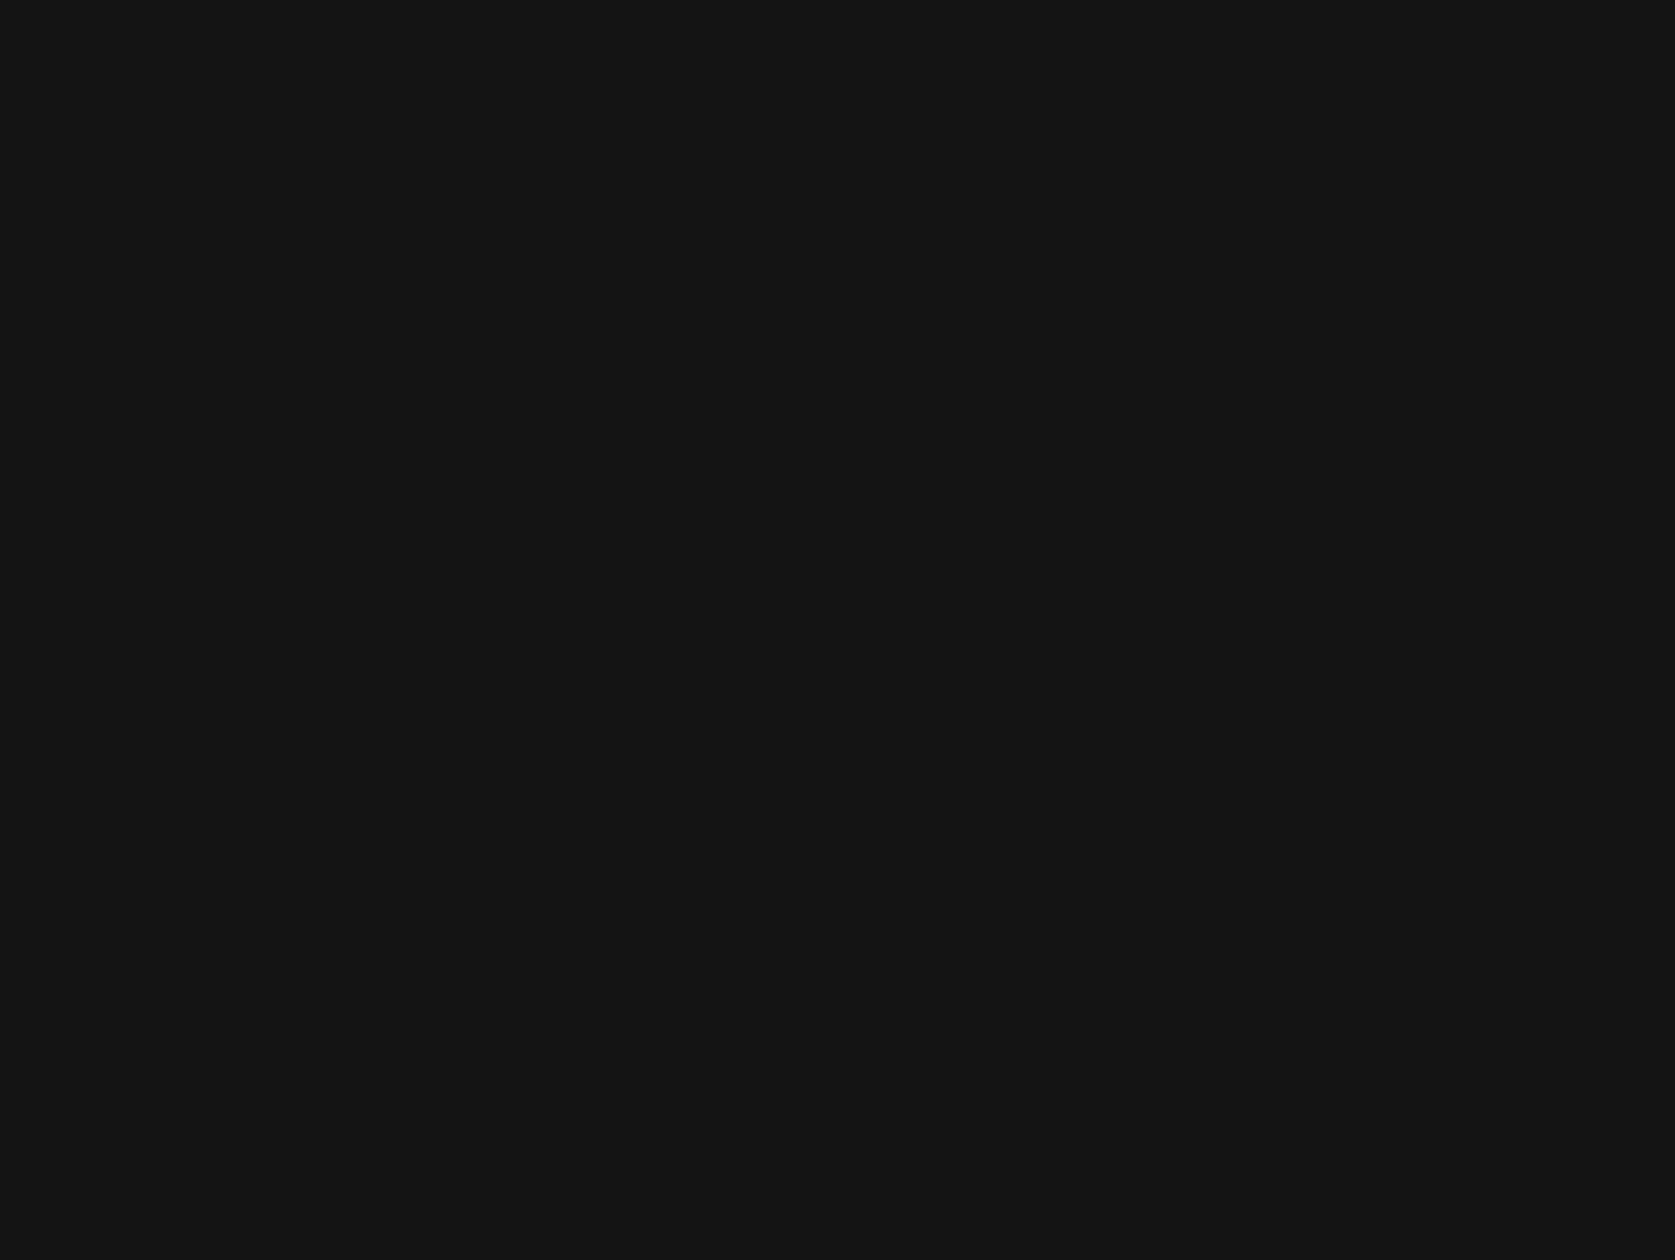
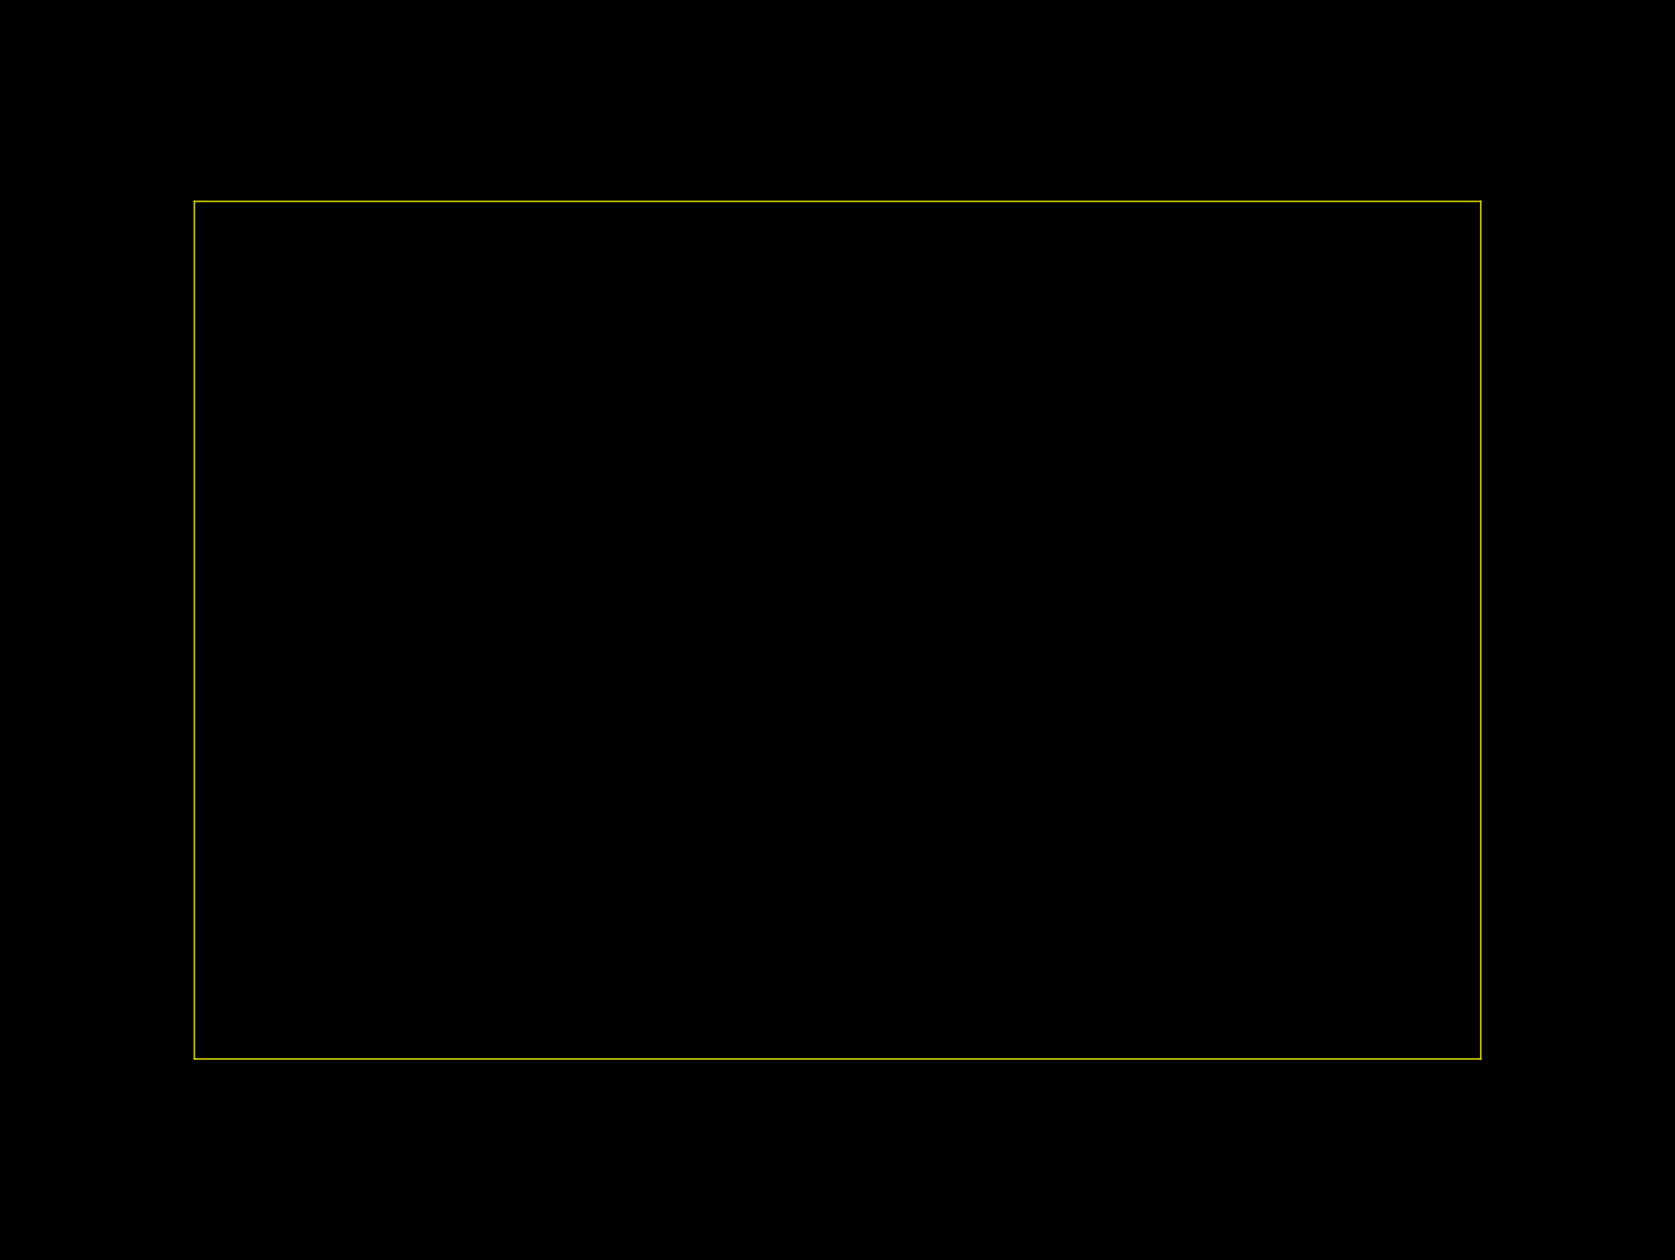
board edge: none -> (1480, 201) (1480, 1058) (194, 1058) (194, 201) (1480, 201)

